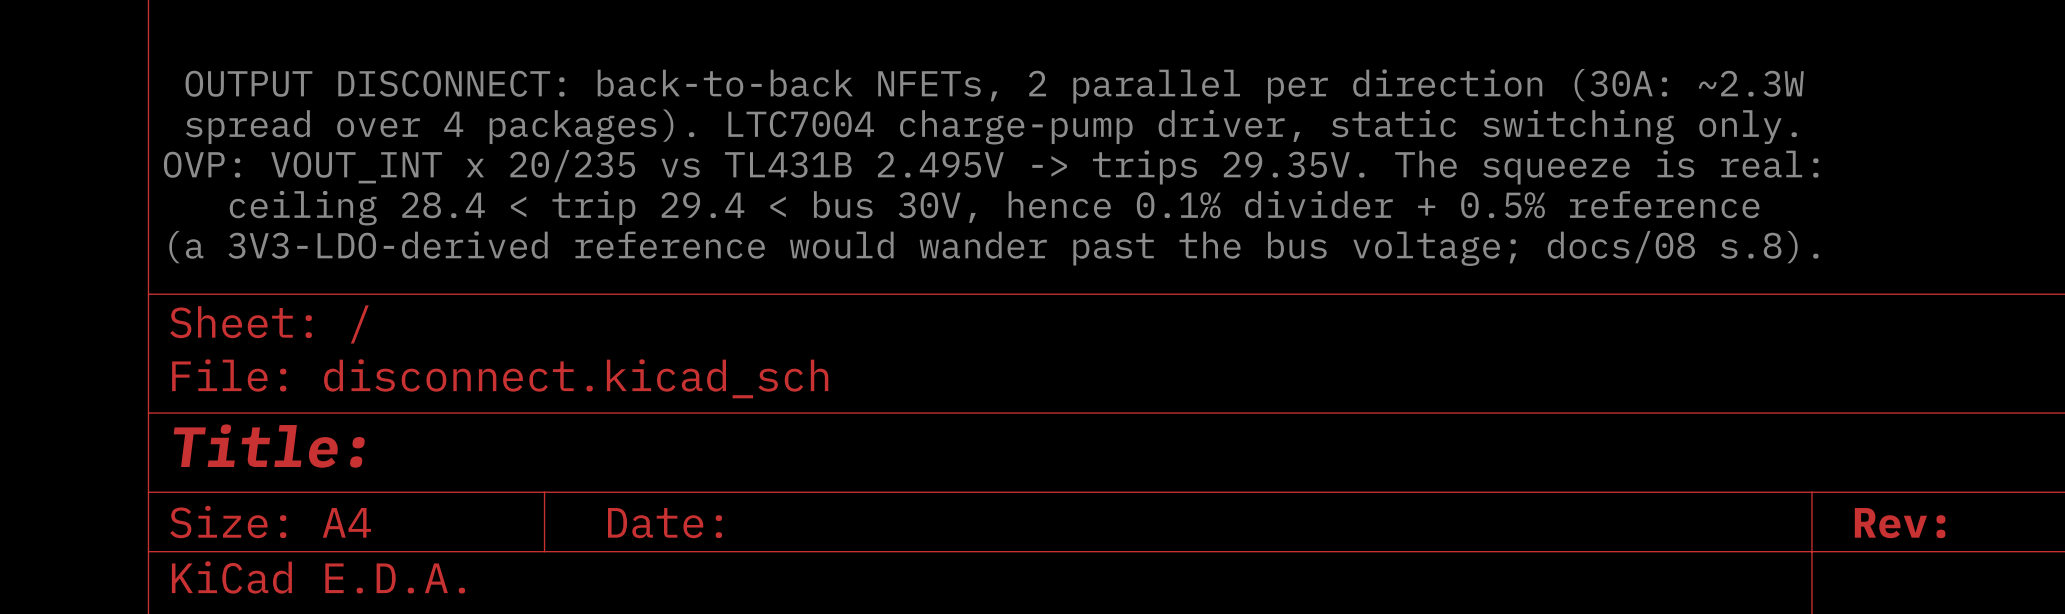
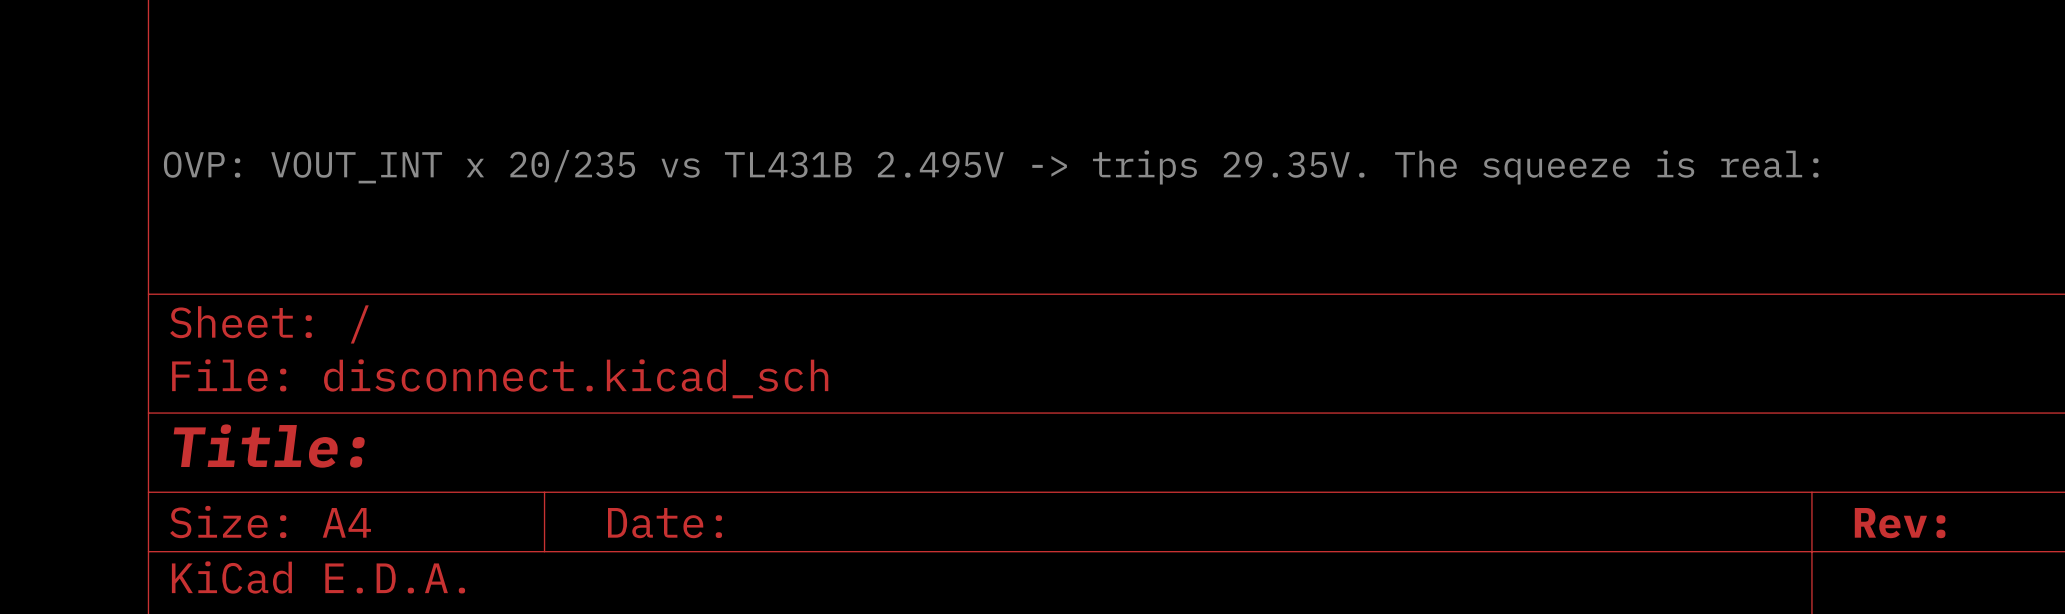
text: OUTPUT DISCONNECT: back-to-back NFETs, 2 parallel per direction (30A: ~2.3W (994, 86) -> none
text: spread over 4 packages). LTC7004 charge-pump driver, static switching only. (991, 126) -> none
text: ceiling 28.4 < trip 29.4 < bus 30V, hence 0.1% divider + 0.5% reference (994, 208) -> none
text: (a 3V3-LDO-derived reference would wander past the bus voltage; docs/08 s.8). (993, 248) -> none

